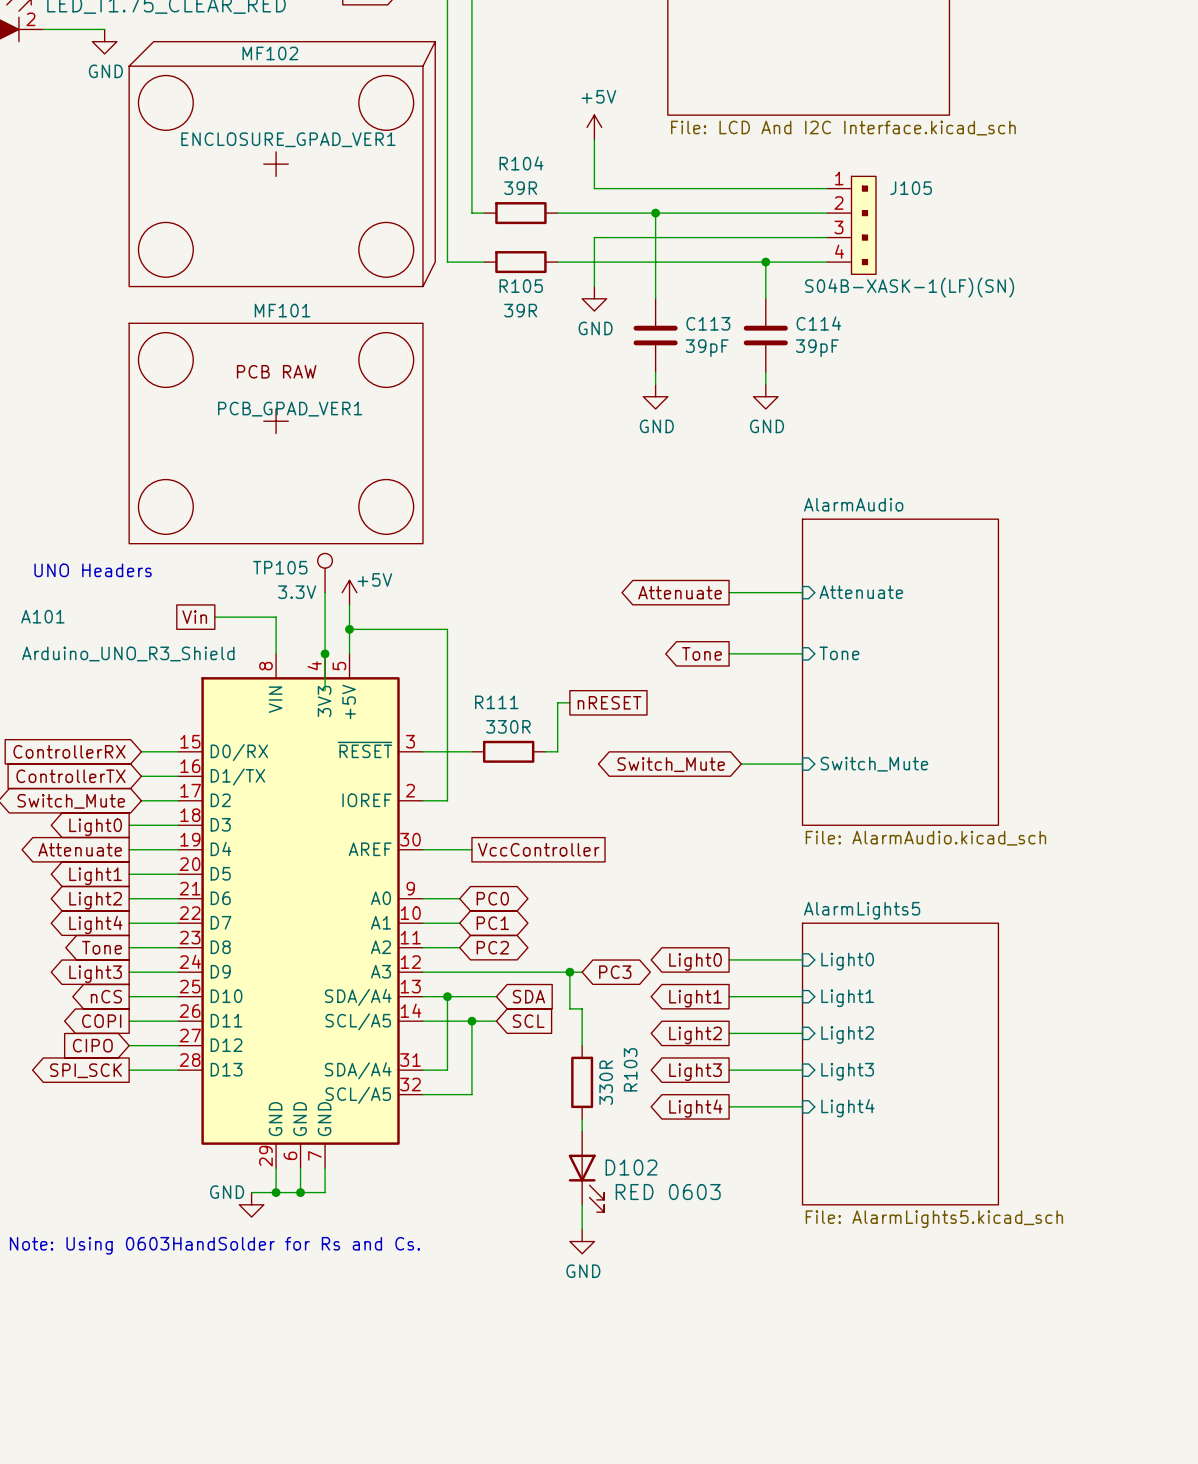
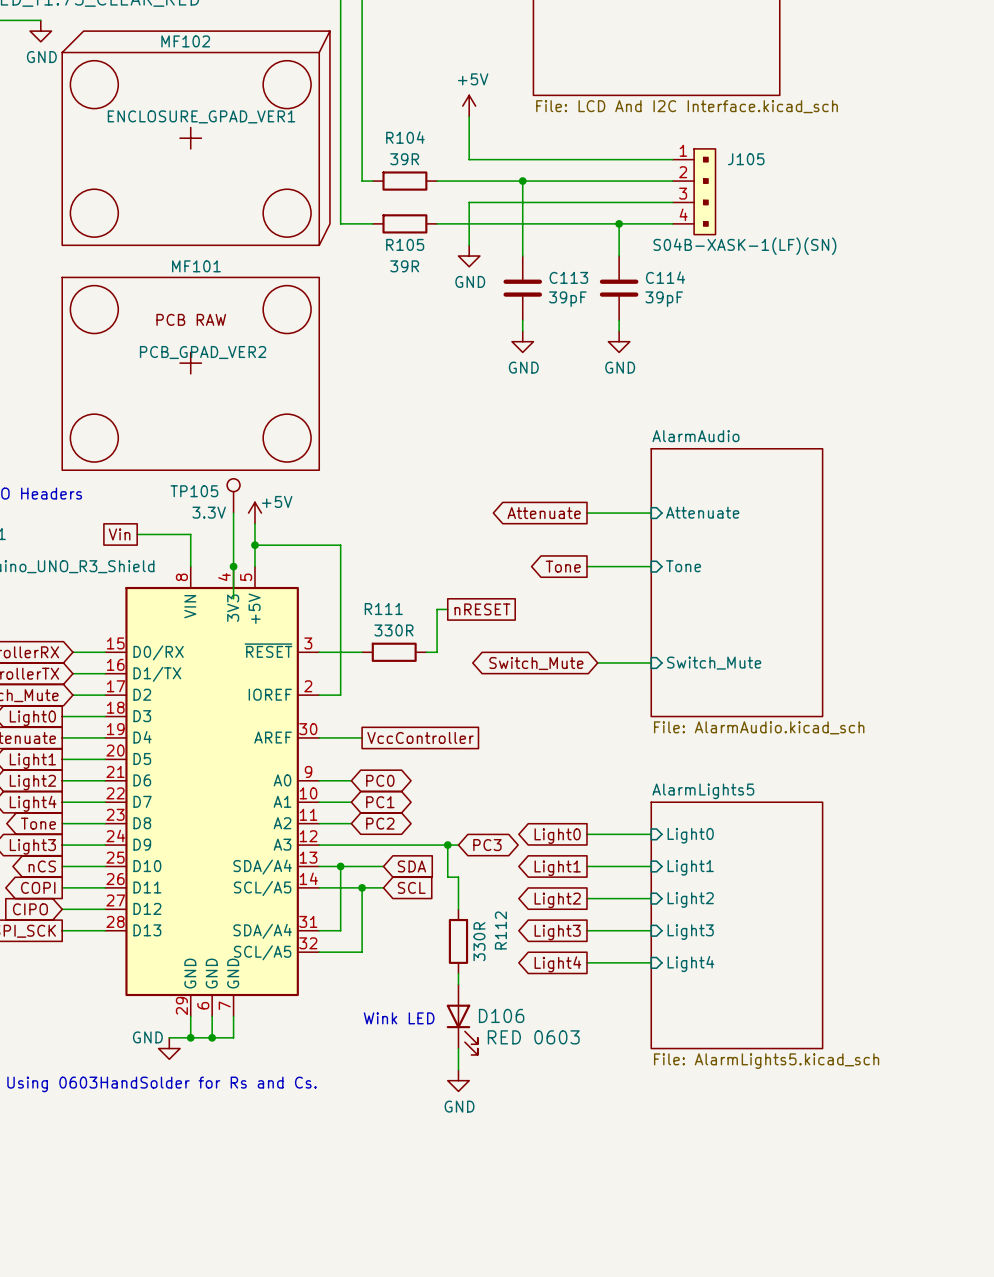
MF101 value: PCB_GPAD_VER1 (290, 409) -> PCB_GPAD_VER2 (203, 352)
R103 name: R103 (630, 1069) -> R112 (500, 930)
D102 name: D102 (631, 1167) -> D106 (501, 1015)
text: none -> Wink LED (399, 1018)

